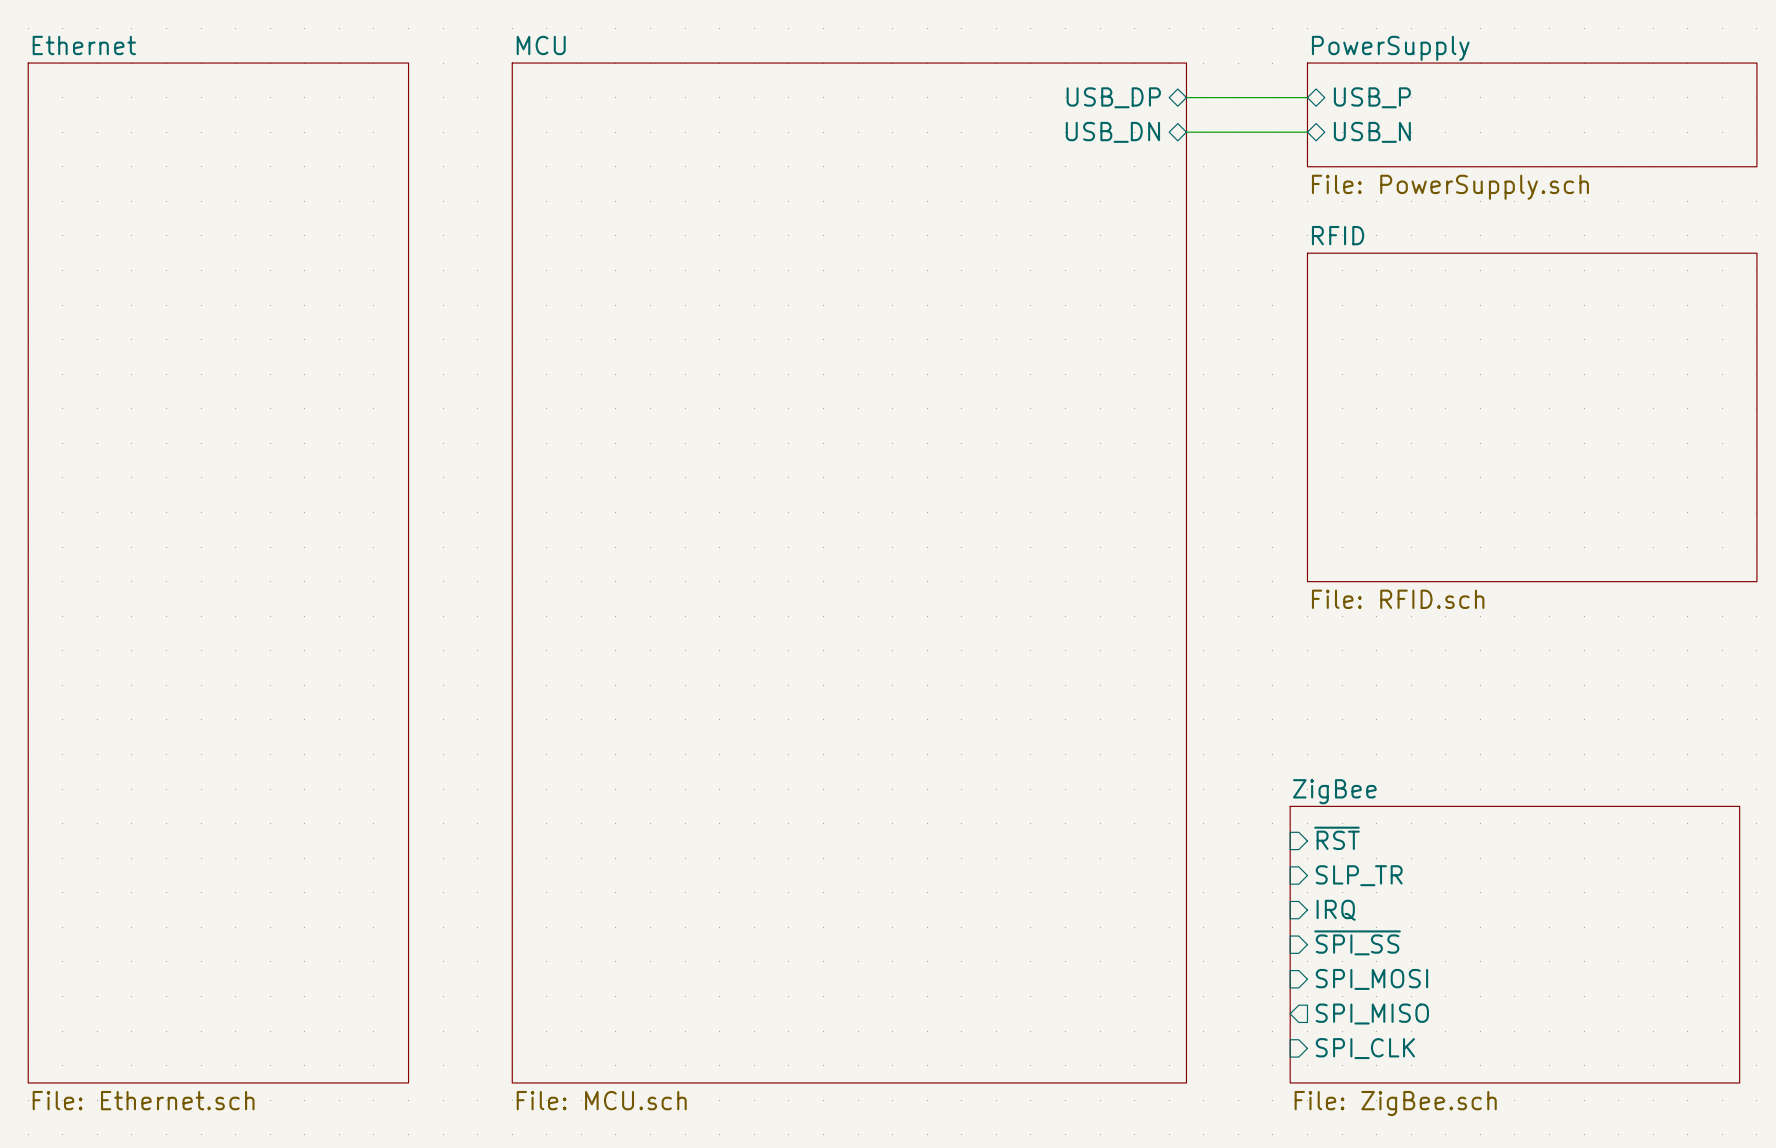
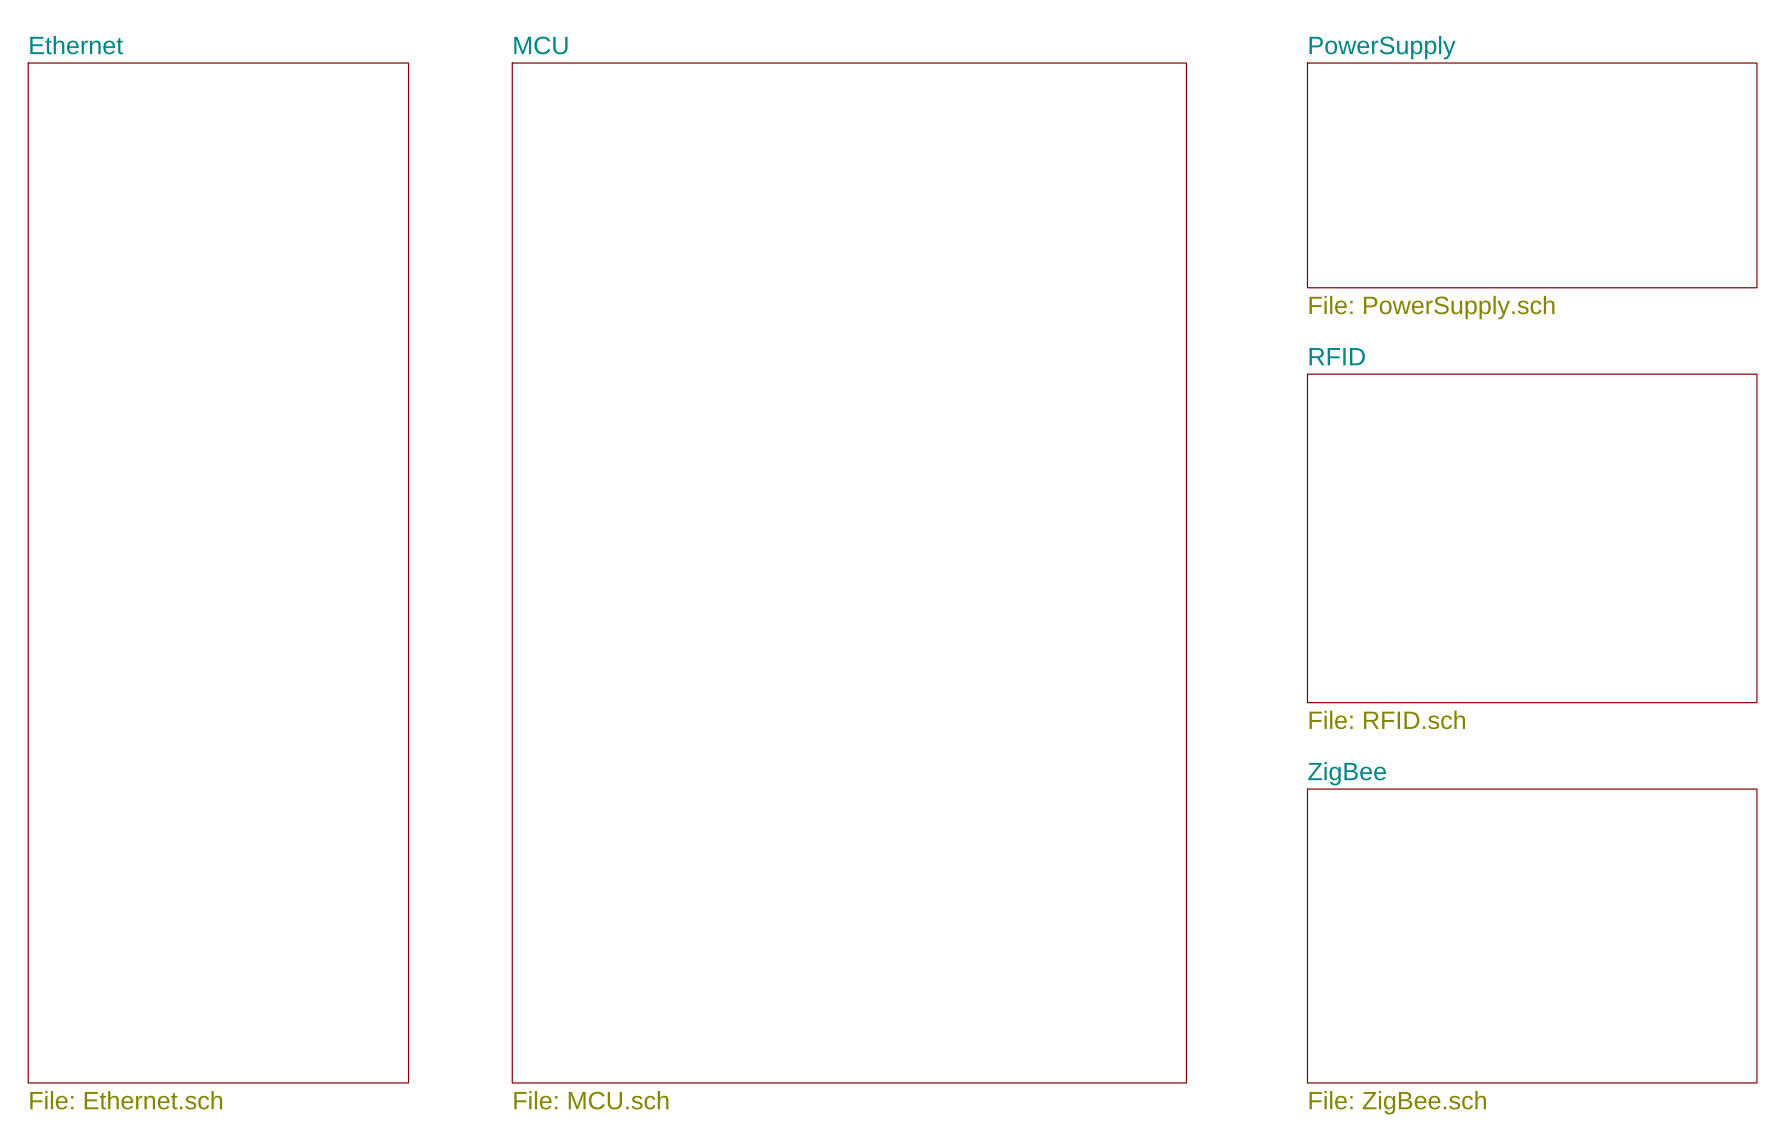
sheet pin: USB_DP (1113, 97) -> none
wire: (1186, 97) (1307, 97) -> none
sheet pin: USB_P (1372, 97) -> none
sheet PowerSupply: File: PowerSupply.sch (1532, 114) -> none
sheet pin: USB_DN (1112, 132) -> none
wire: (1186, 132) (1307, 132) -> none
sheet pin: USB_N (1372, 132) -> none
sheet PowerSupply: none -> File: PowerSupply.sch (1532, 175)
sheet RFID position: (1532, 417) -> (1532, 538)
sheet pin: ~{RST} (1337, 838) -> none
sheet pin: SLP_TR (1359, 875) -> none
sheet pin: IRQ (1336, 910) -> none
sheet ZigBee: none -> File: ZigBee.sch (1532, 936)
sheet pin: ~{SPI_SS} (1357, 942) -> none
sheet ZigBee: File: ZigBee.sch (1514, 944) -> none
sheet pin: SPI_MOSI (1371, 979) -> none
sheet pin: SPI_MISO (1372, 1014) -> none
sheet pin: SPI_CLK (1365, 1048) -> none

